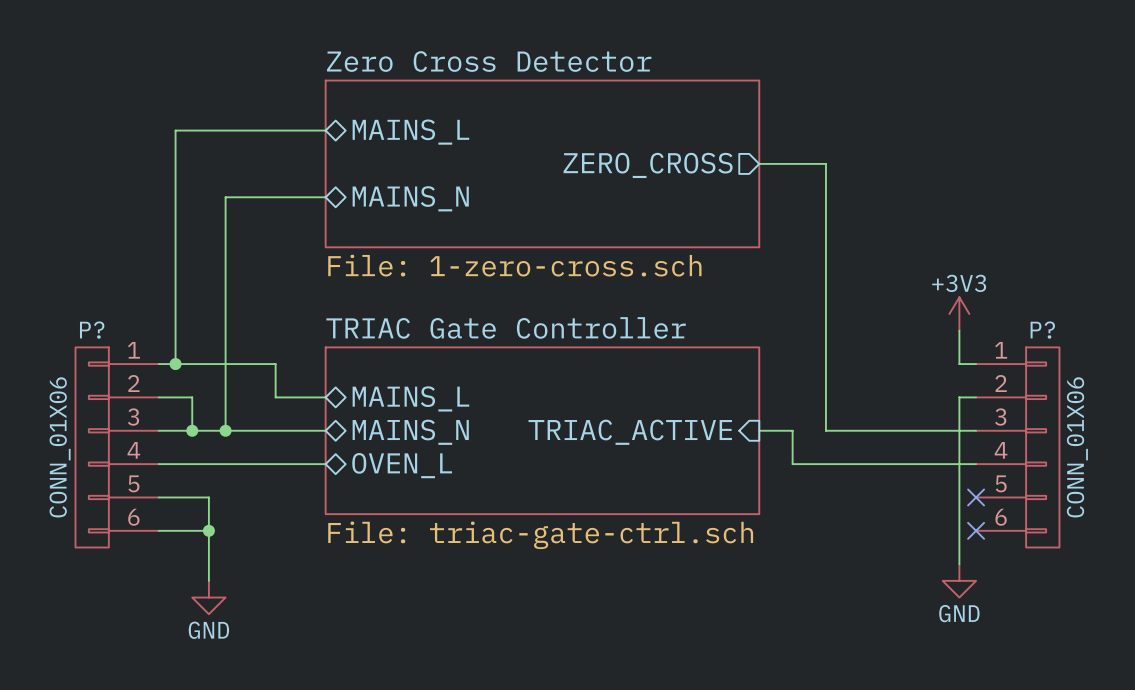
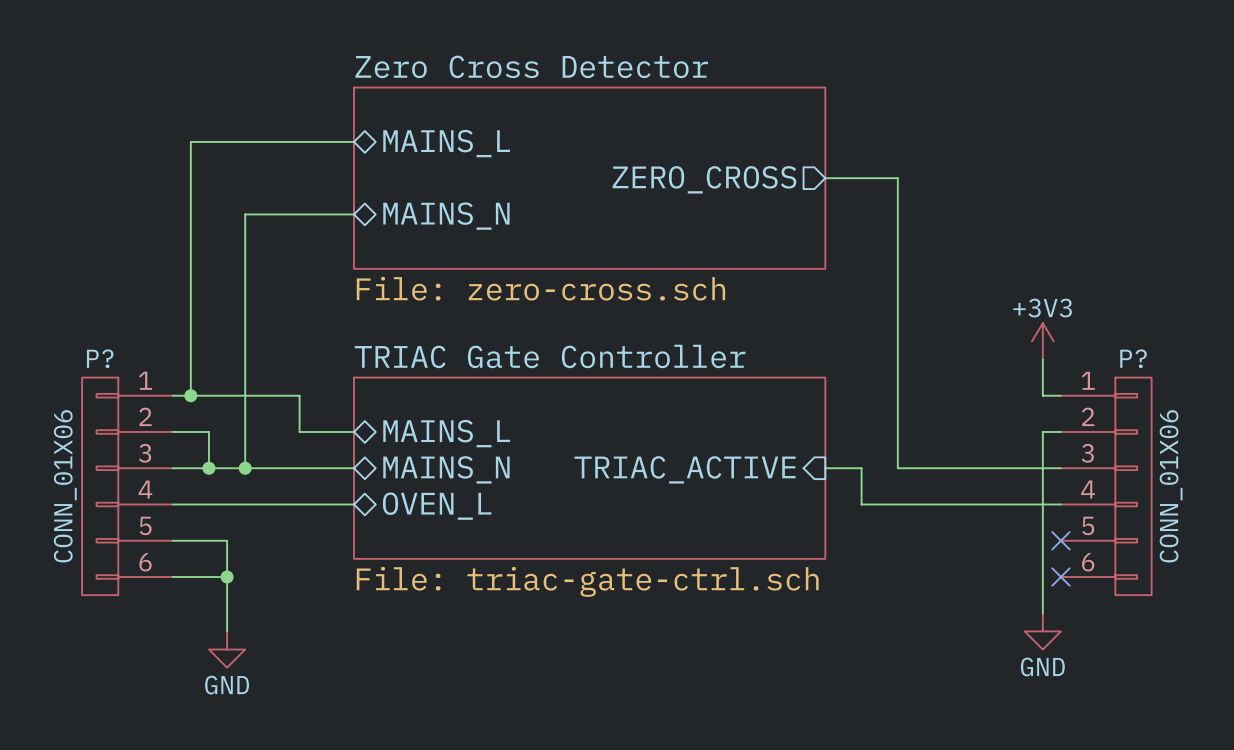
sheet Zero Cross Detector value: File: 1-zero-cross.sch (514, 265) -> File: zero-cross.sch (540, 288)

